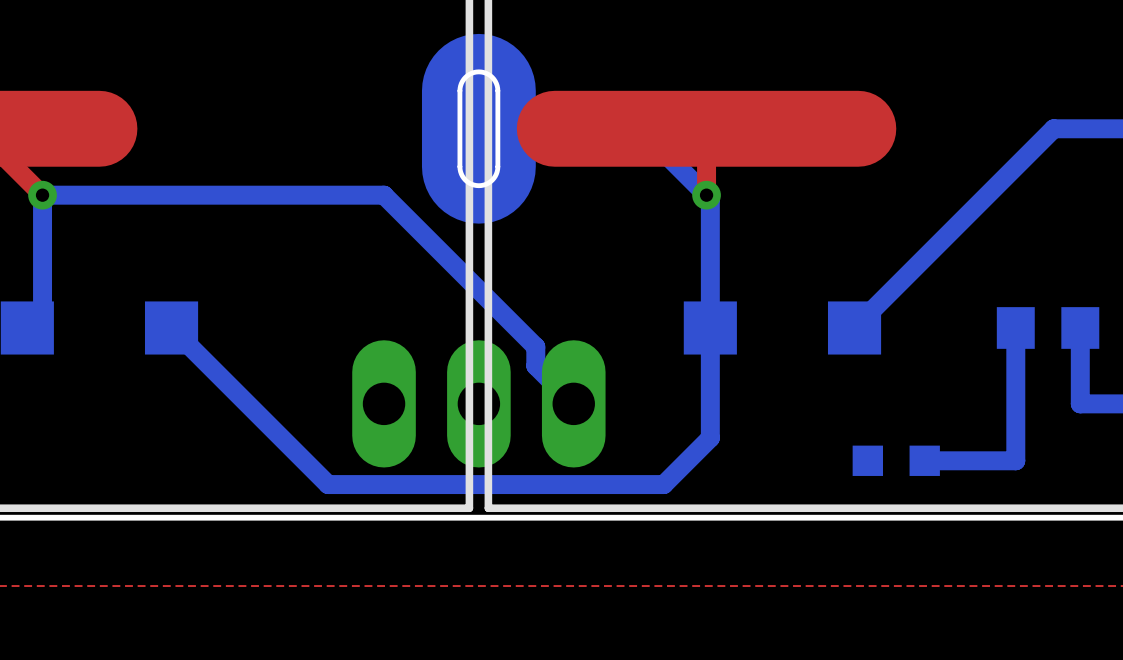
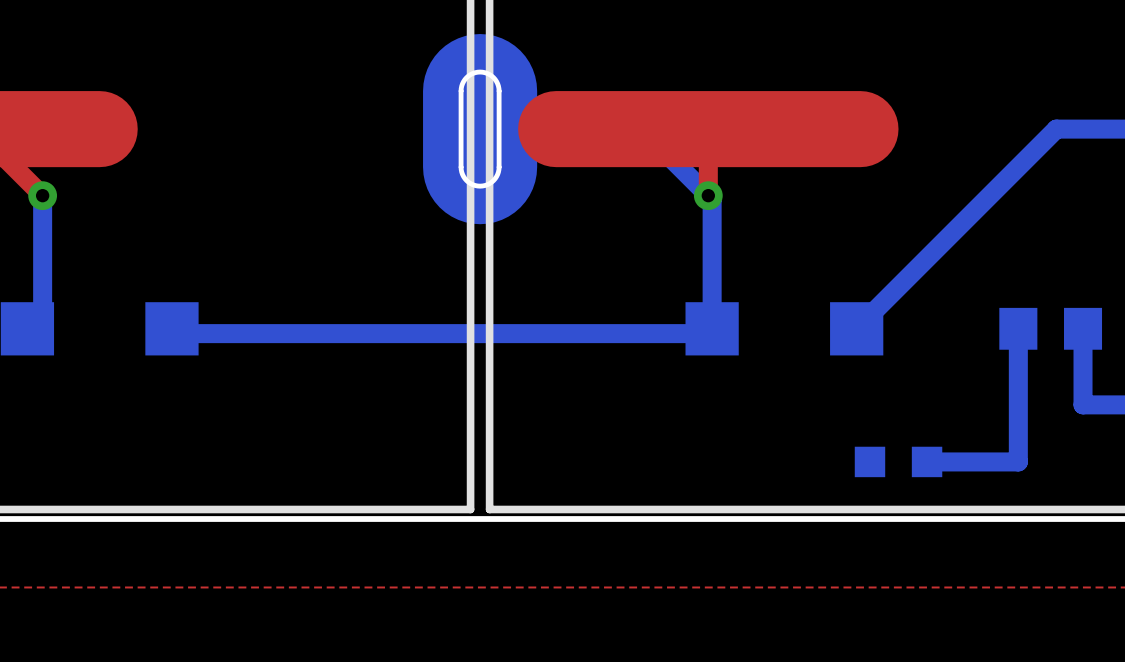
bottom track: (42, 195) (384, 195) (535, 346) (535, 365) (573, 403) -> none
bottom track: (176, 332) (328, 484) (663, 484) (710, 438) (710, 332) -> (176, 333) (712, 333)
part: (478, 403) -> none

